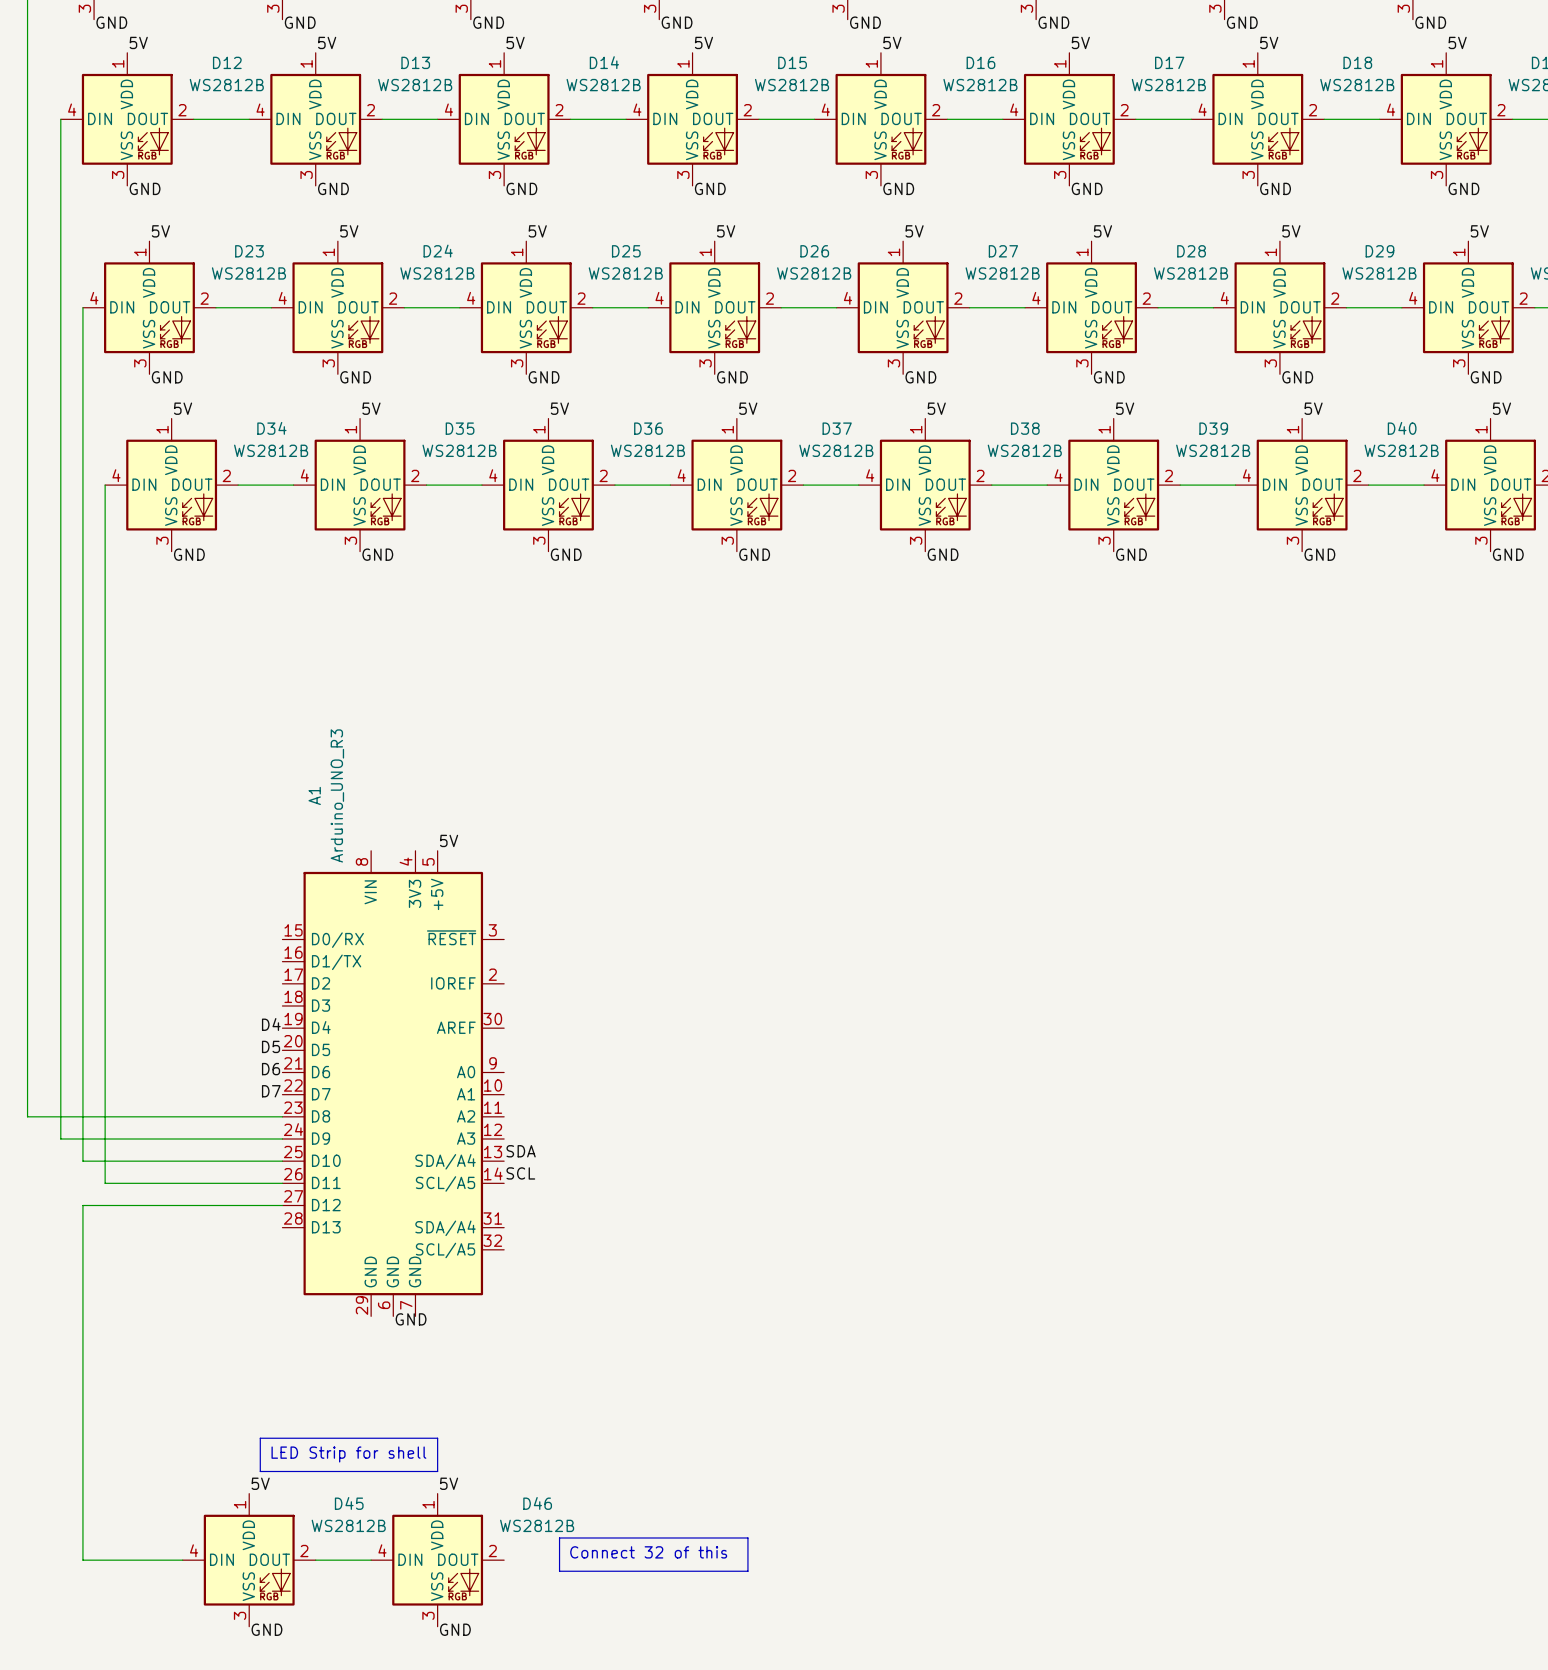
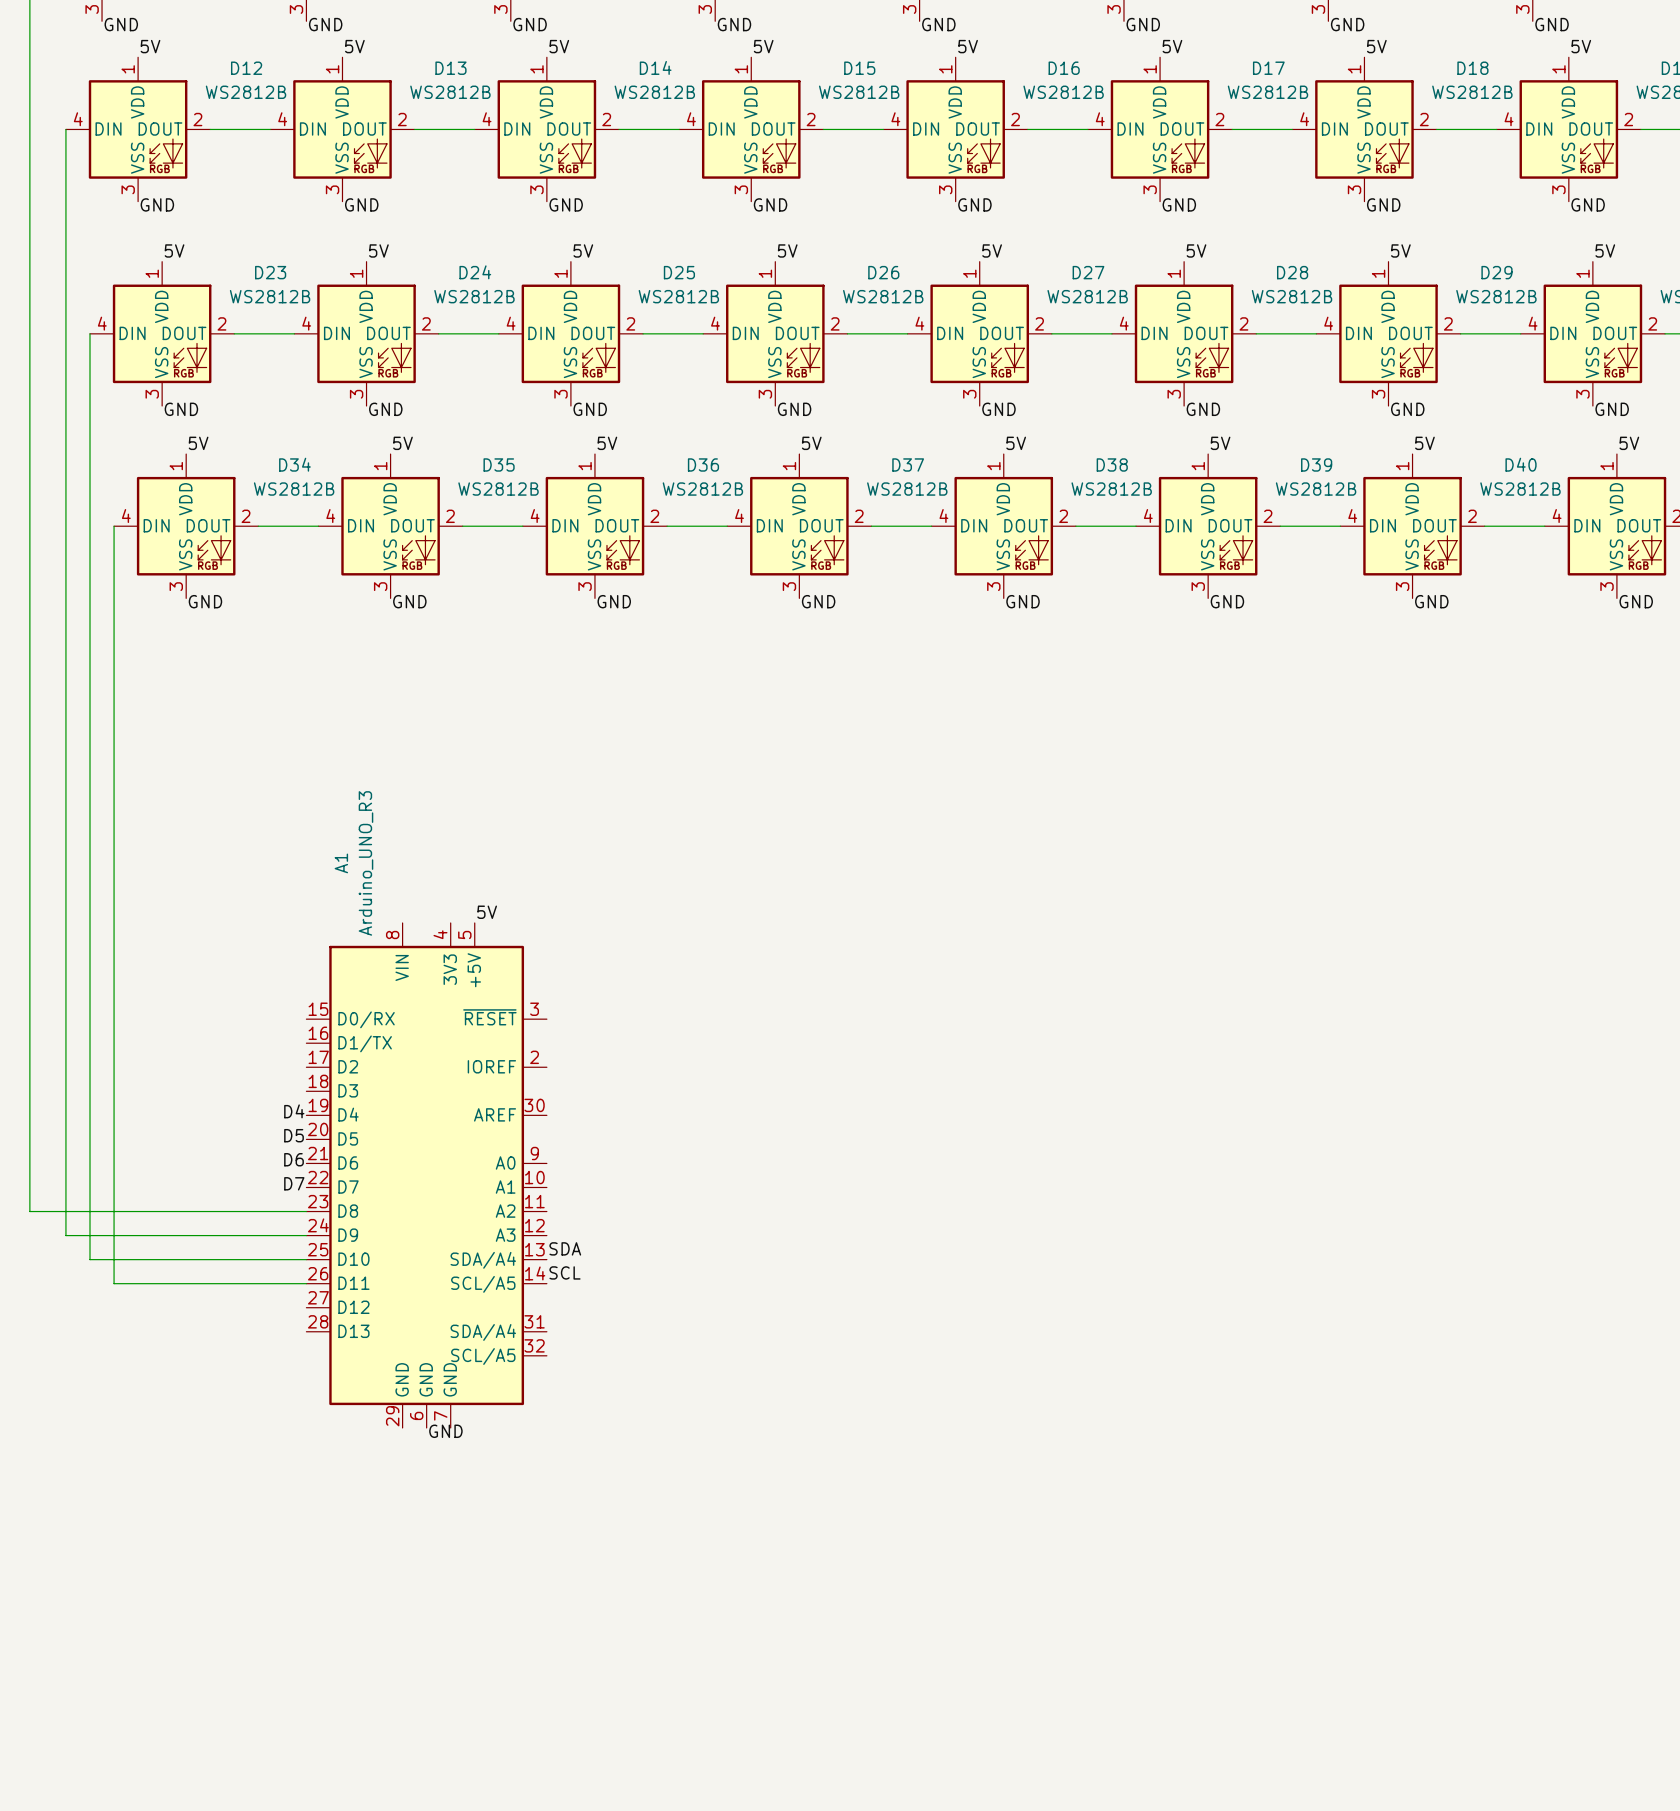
wire: (282, 1205) (82, 1205) (82, 1560) (182, 1560) -> none
line: (260, 1438) (437, 1438) (437, 1471) (260, 1471) (260, 1438) -> none
text: LED Strip for shell (348, 1454) -> none
label: 5V (260, 1483) -> none
label: 5V (449, 1483) -> none
line: (559, 1537) (747, 1537) (747, 1571) (559, 1571) (559, 1537) -> none
text: Connect 32 of this (648, 1552) -> none
D45: WS2812B (249, 1560) -> none
wire: (315, 1560) (371, 1560) -> none
D46: WS2812B (437, 1560) -> none
label: GND (266, 1629) -> none
label: GND (455, 1629) -> none

